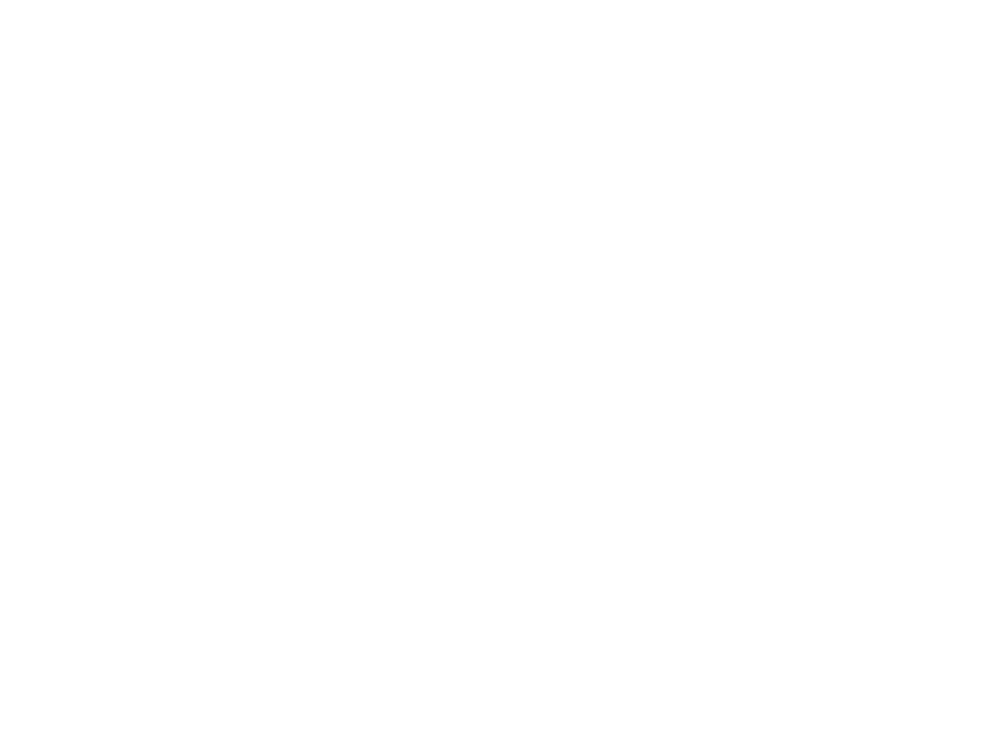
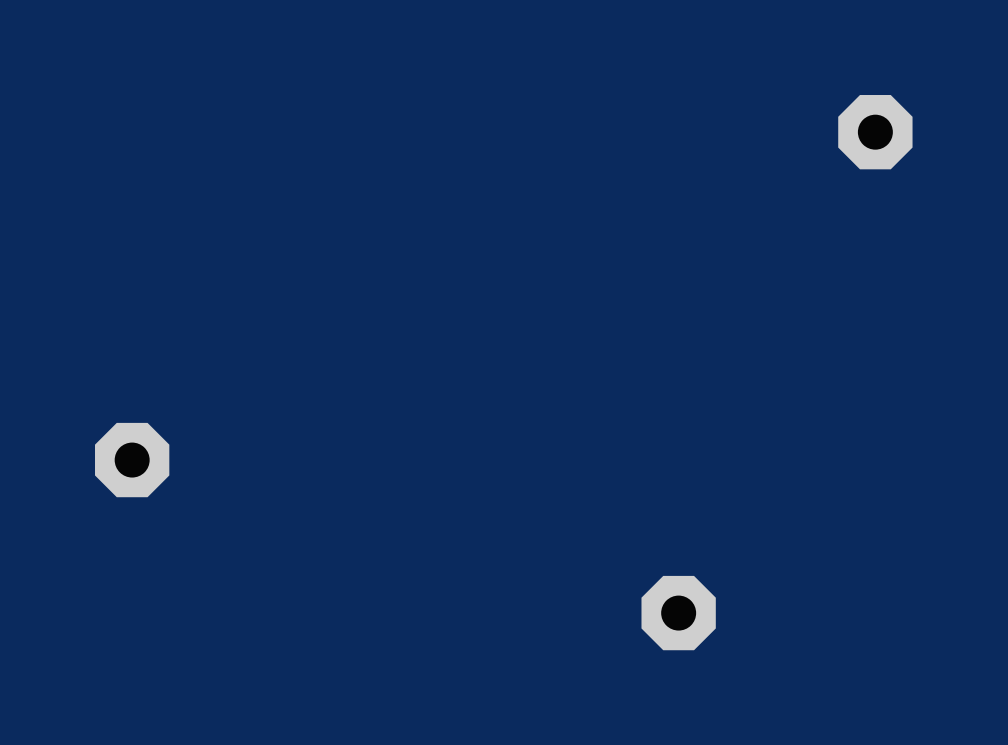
part: none -> (875, 132)
part: none -> (132, 460)
part: none -> (678, 613)

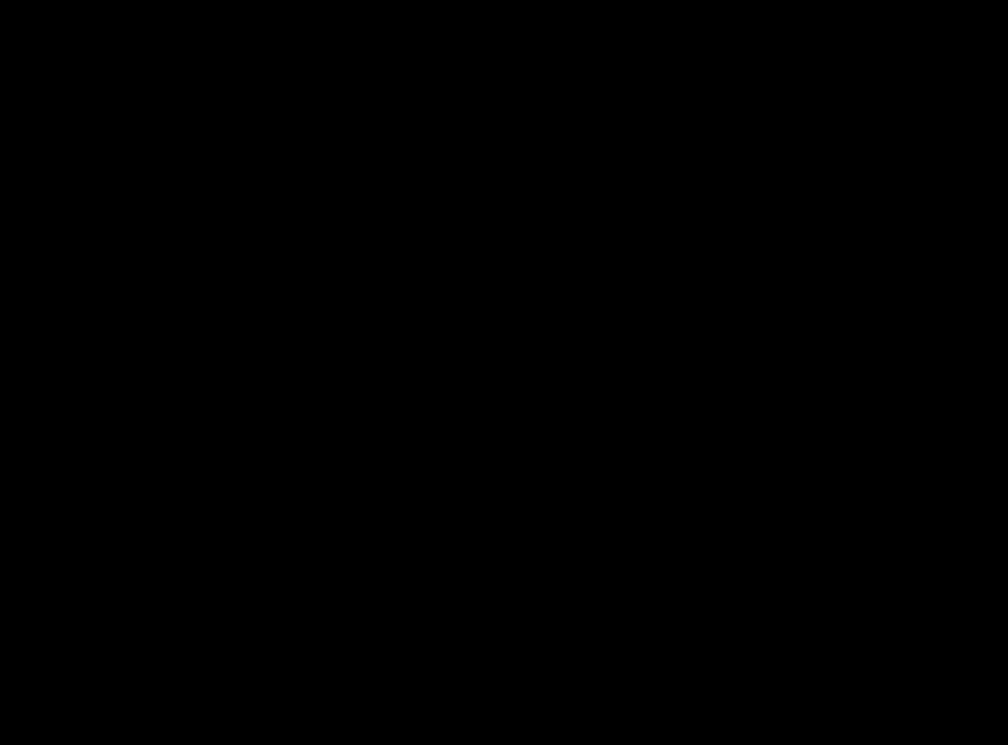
part: (875, 132) -> none
part: (132, 460) -> none
part: (678, 613) -> none

